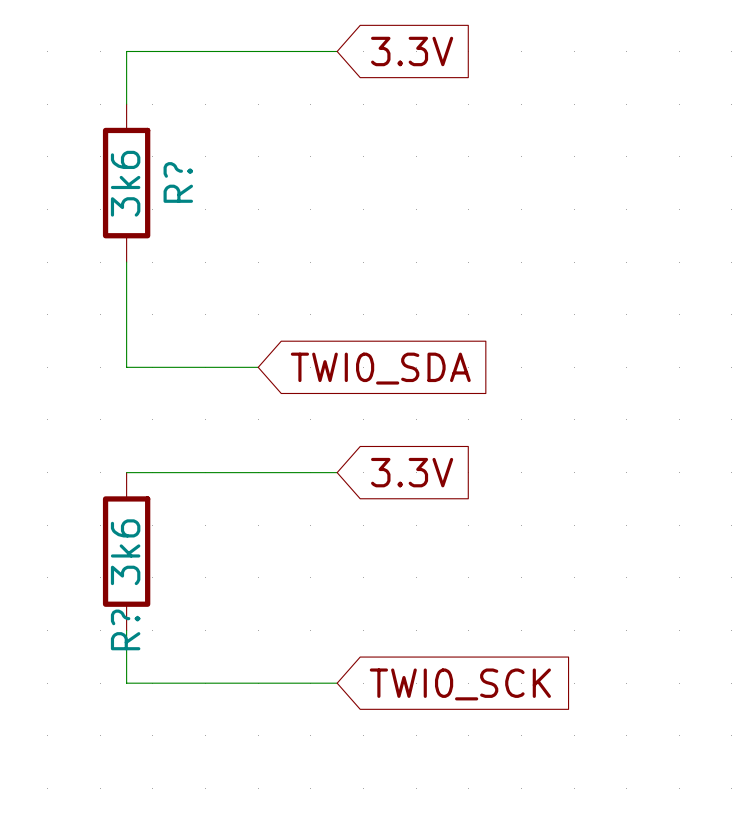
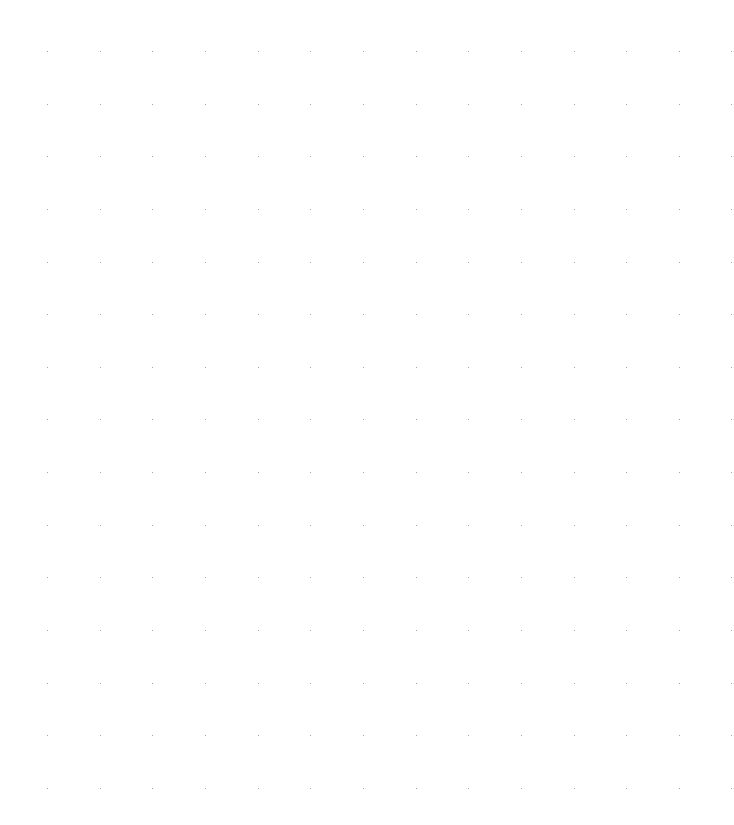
wire: (337, 51) (126, 51) (126, 104) -> none
global label: 3.3V (412, 51) -> none
R?: 3k6 (126, 183) -> none
wire: (126, 262) (126, 367) (258, 367) -> none
global label: TWI0_SDA (380, 368) -> none
wire: (126, 472) (337, 472) -> none
global label: 3.3V (412, 472) -> none
R?: 3k6 (126, 551) -> none
wire: (126, 630) (126, 683) (337, 683) -> none
global label: TWI0_SCK (460, 684) -> none

